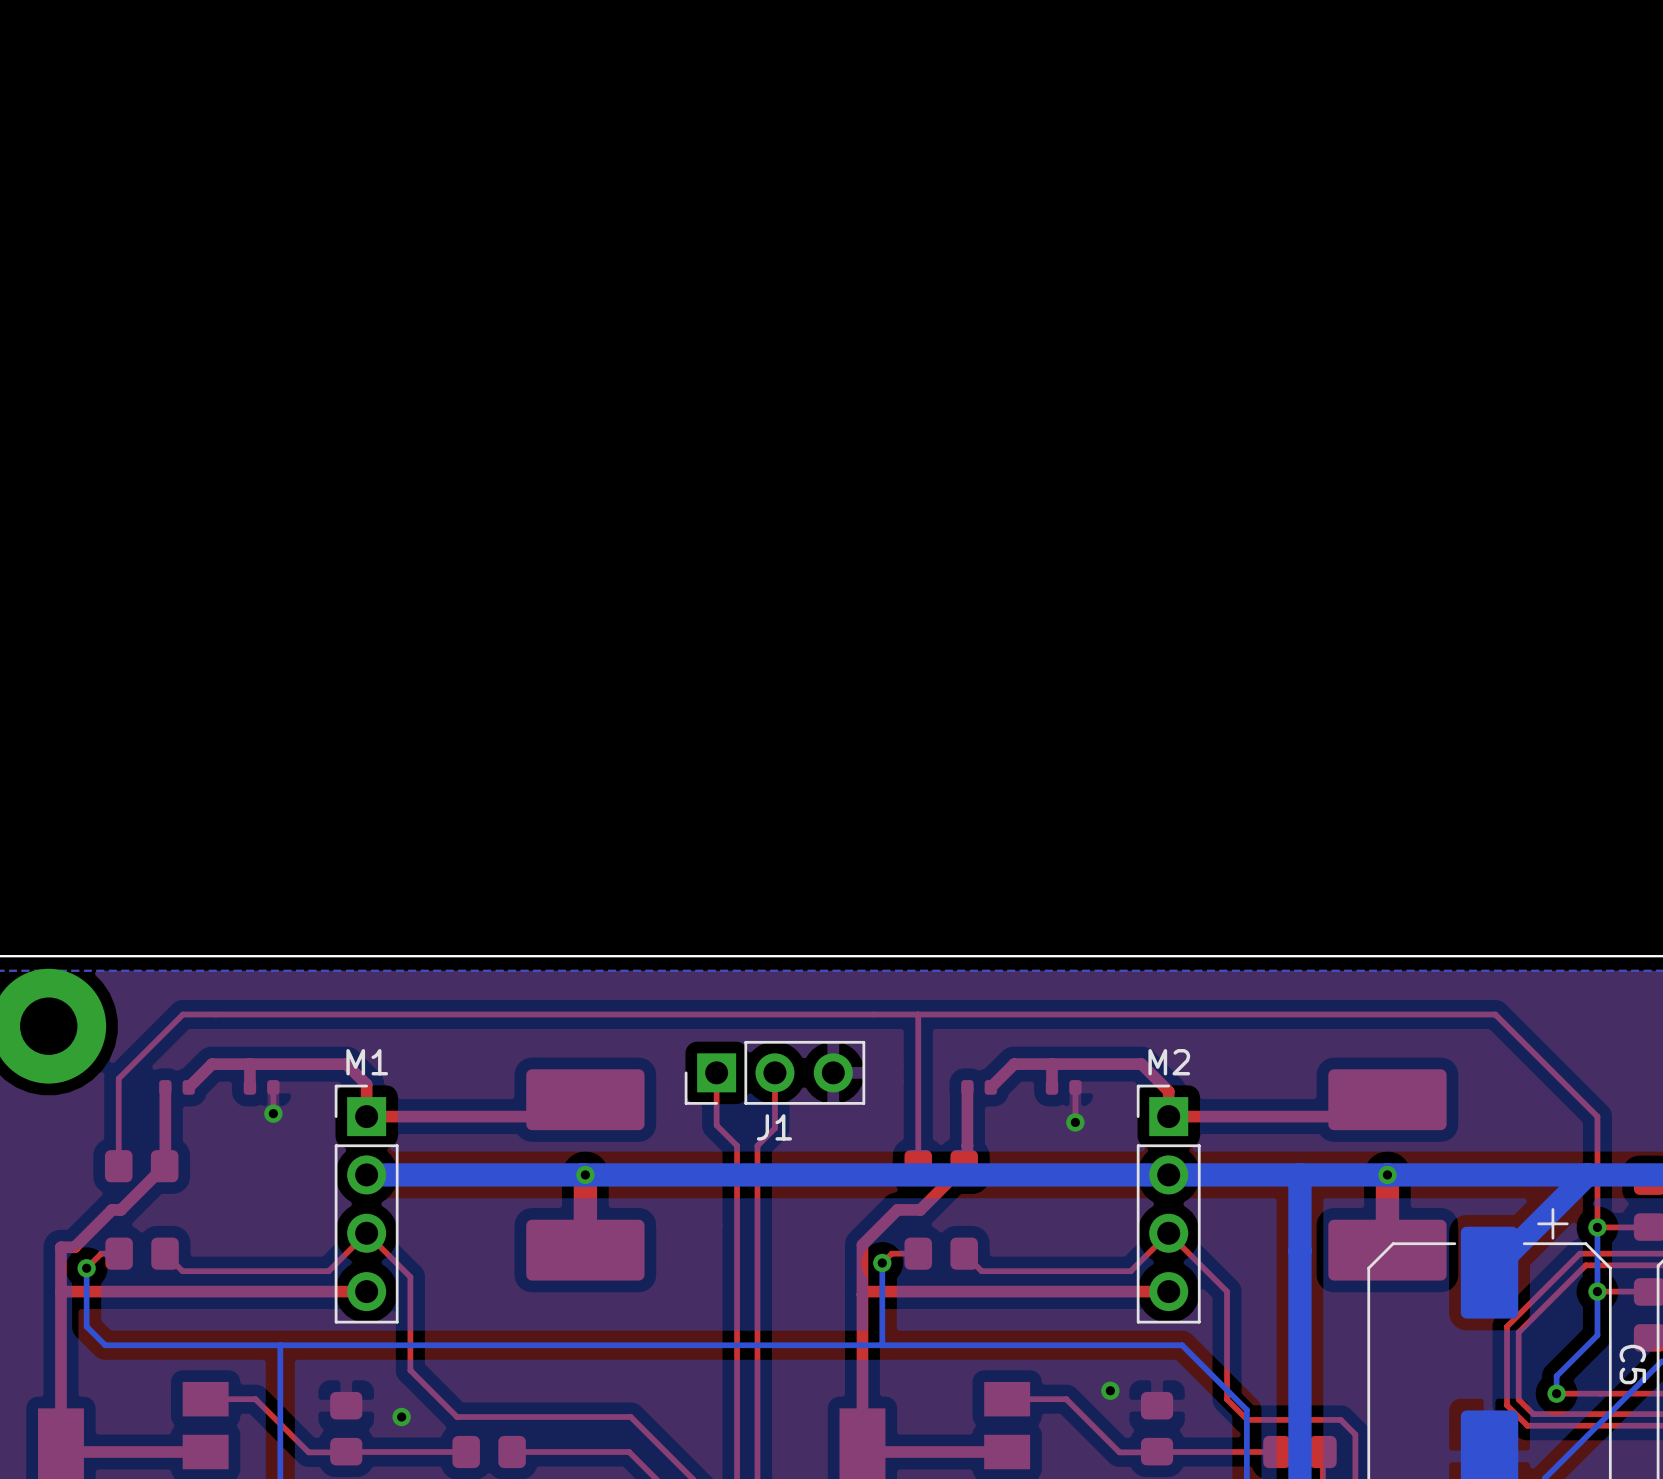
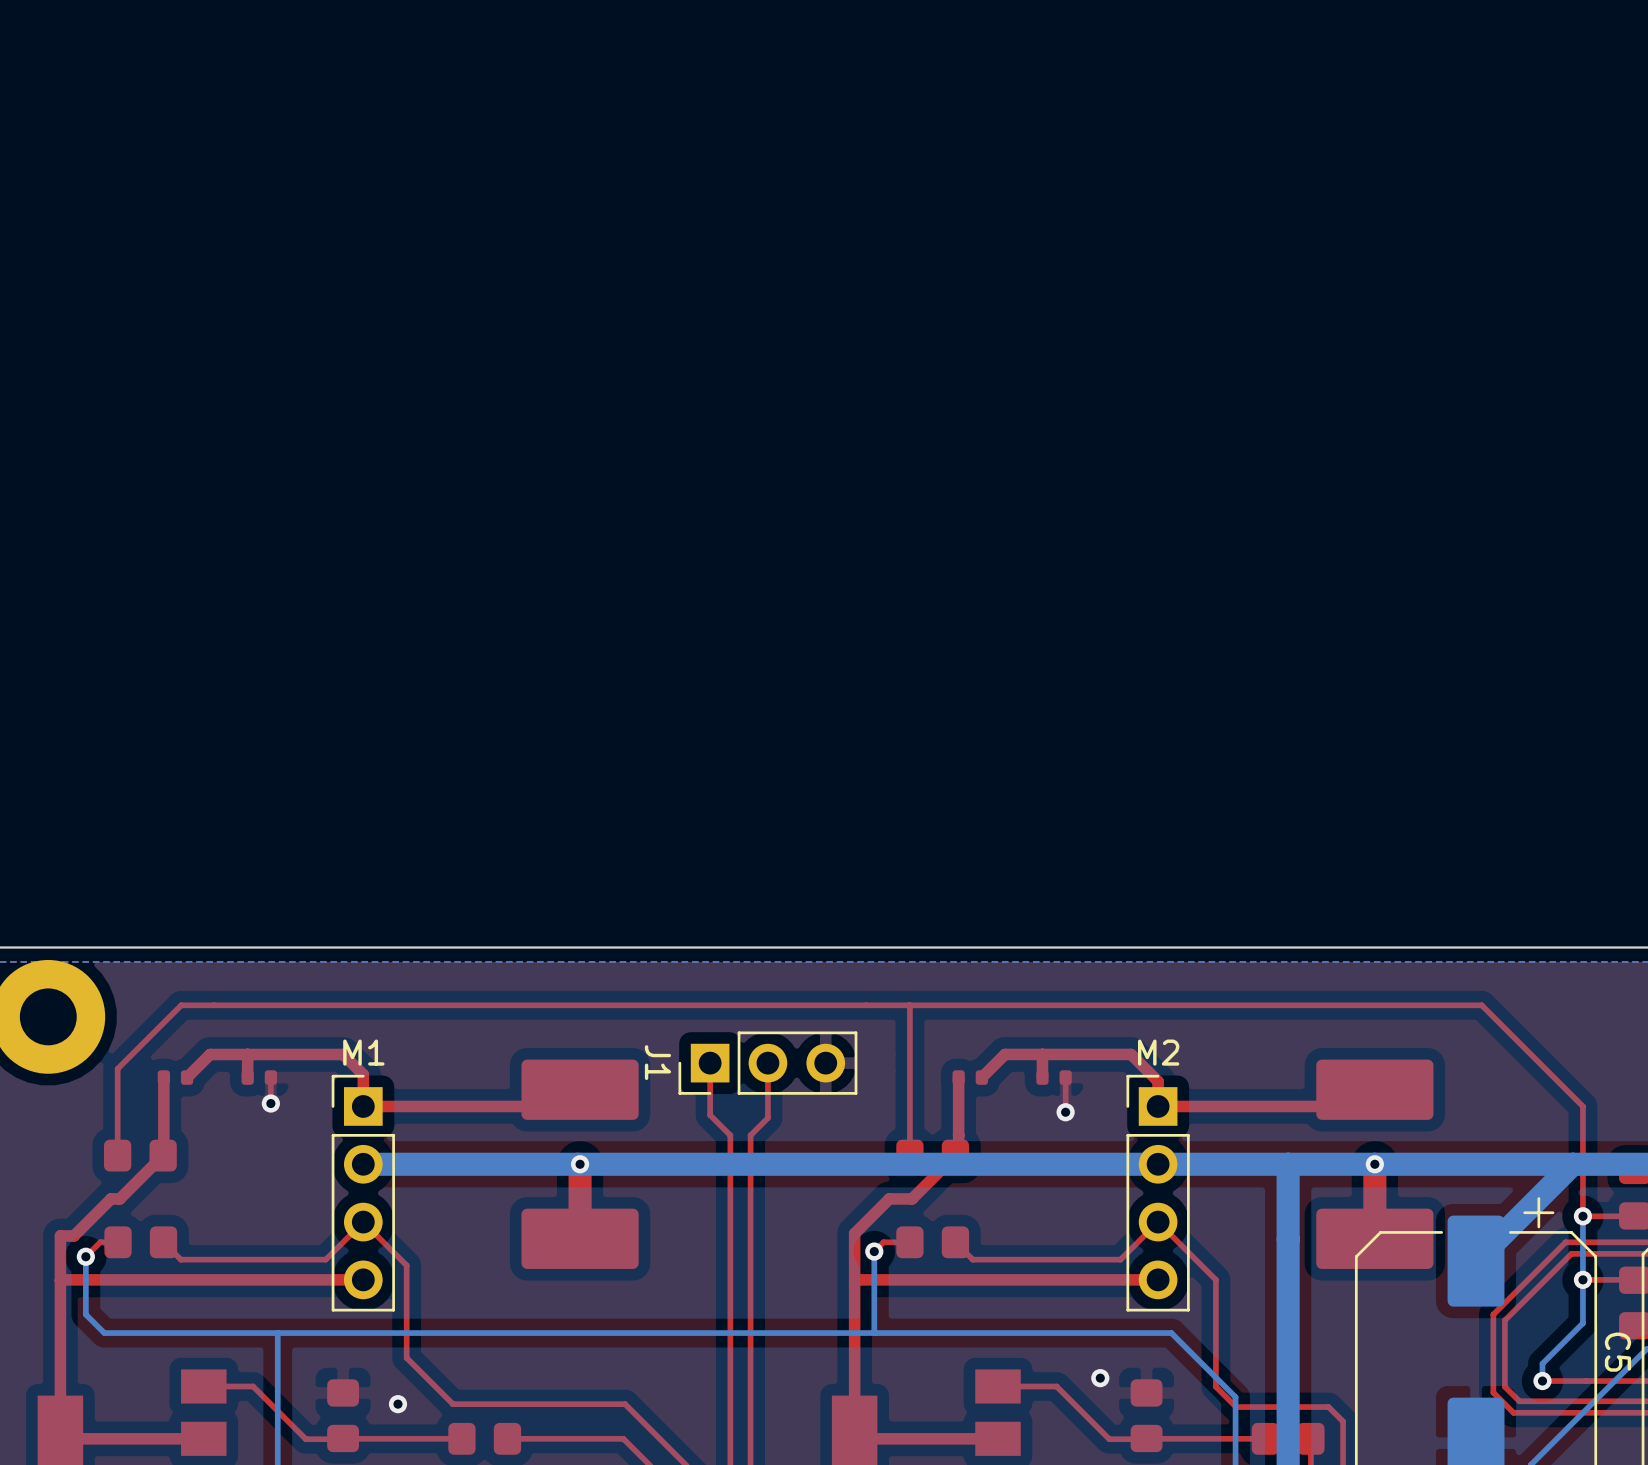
J1 name rotation: 0° (774, 1127) -> 90° clockwise (657, 1062)
J1 name position: J1 (774, 1127) -> J1 (657, 1062)

